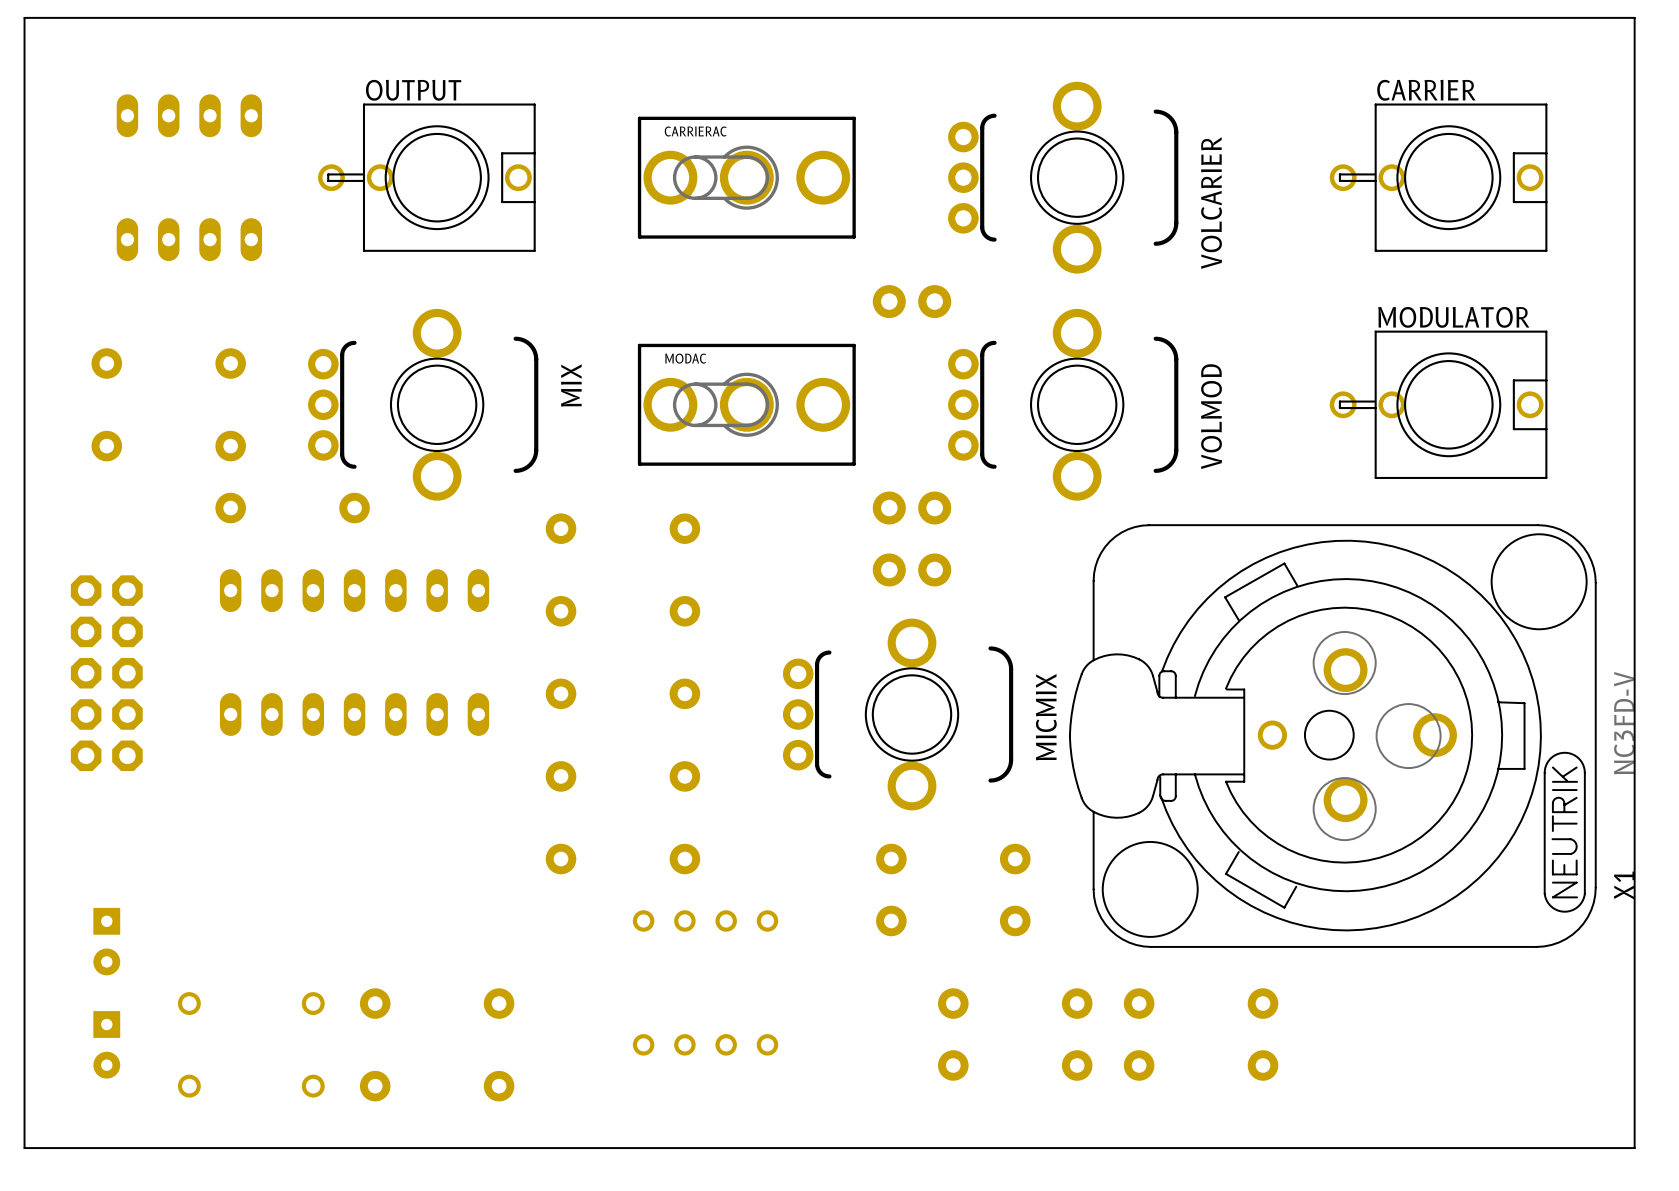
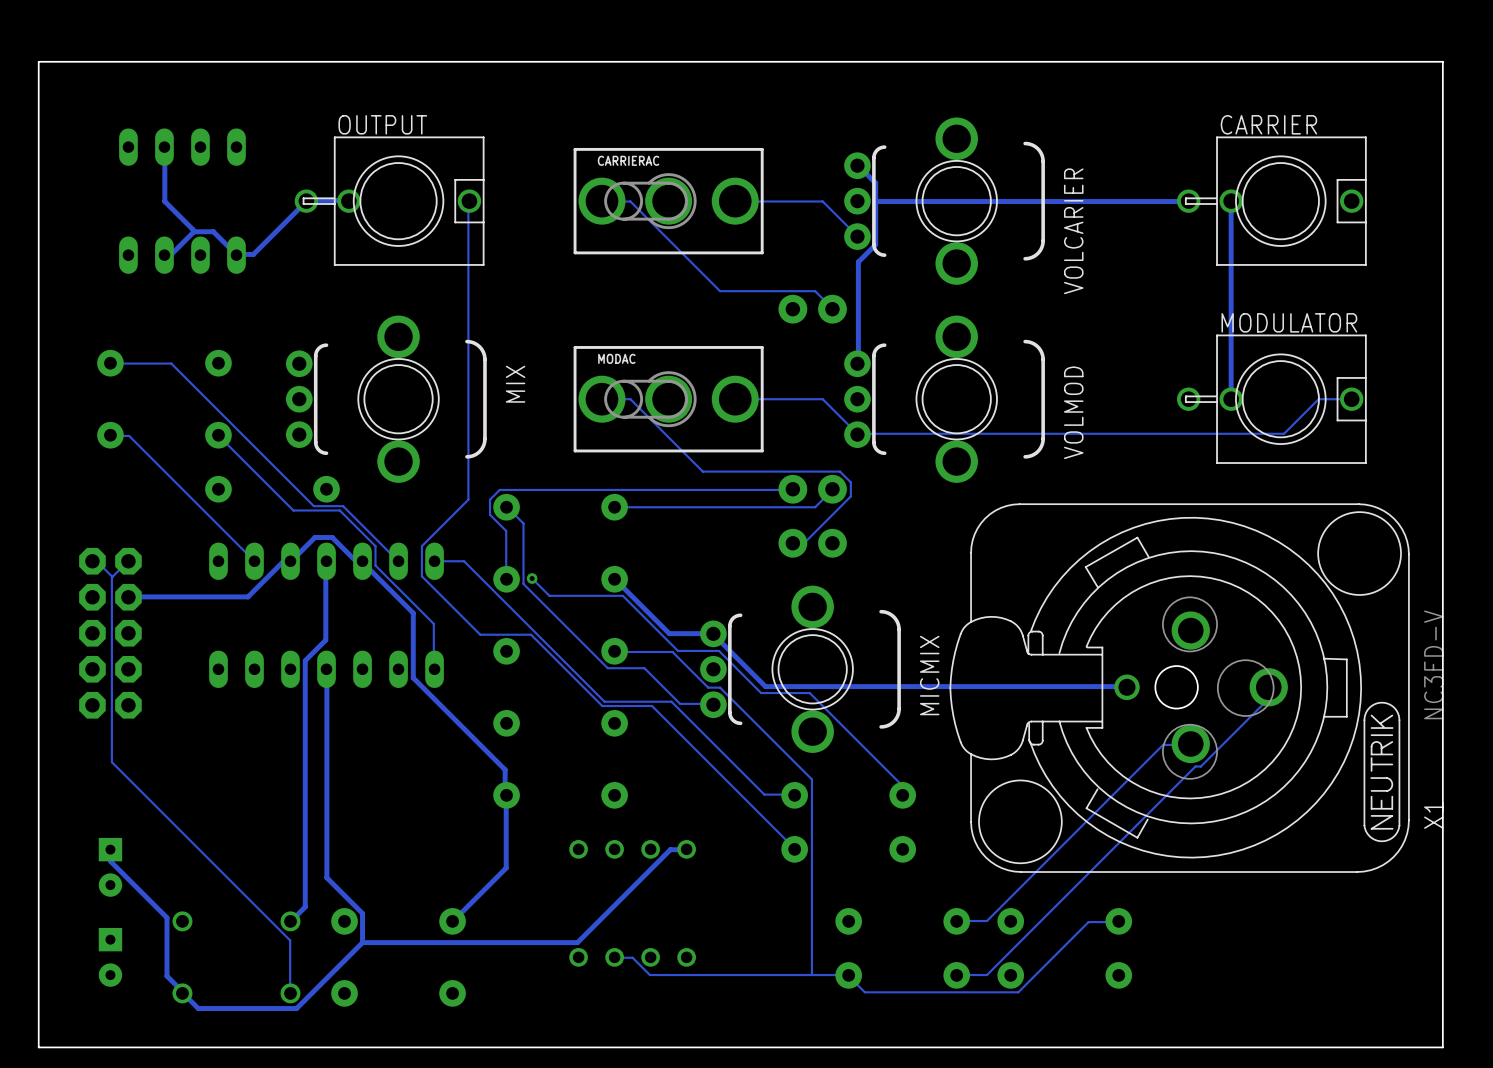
track: none -> (164, 147) (164, 201) (194, 231)
track: none -> (857, 165) (875, 183) (875, 244) (858, 262) (857, 363)
track: none -> (348, 201) (306, 201) (253, 254) (236, 255) (213, 231) (194, 231)
track: none -> (469, 201) (468, 499) (421, 546) (421, 576) (480, 634) (531, 634) (602, 706) (652, 706) (794, 849)
track: none -> (601, 201) (630, 201) (720, 291) (815, 291) (832, 309)
track: none -> (735, 201) (822, 201) (857, 236)
track: none -> (1188, 201) (875, 201)
track: none -> (1231, 201) (1231, 399)
track: none -> (194, 231) (171, 254) (164, 255)
track: none -> (110, 363) (171, 363) (313, 506) (343, 506) (398, 561)
track: none -> (601, 399) (630, 399) (702, 471) (840, 471) (850, 482) (850, 496) (804, 542) (792, 543)
track: none -> (1351, 399) (1318, 399) (1284, 433) (857, 434) (822, 399) (735, 399)
track: none -> (110, 435) (129, 435) (254, 561)
track: none -> (218, 435) (293, 510) (339, 510) (375, 546) (375, 565) (433, 623) (434, 669)
track: none -> (792, 489) (499, 489) (490, 499) (490, 514) (506, 531) (506, 579)
track: none -> (832, 489) (815, 507) (614, 507)
track: none -> (506, 507) (523, 523) (523, 583) (607, 668) (644, 668) (680, 703) (713, 704)
track: none -> (92, 561) (96, 561) (112, 576)
track: none -> (128, 561) (111, 577) (111, 762) (290, 940) (290, 993)
track: none -> (326, 561) (325, 640) (305, 660) (305, 906) (290, 921)
track: none -> (434, 561) (464, 561) (604, 701) (671, 701) (764, 794) (794, 795)
track: none -> (532, 578) (549, 595) (622, 595) (677, 650) (719, 650) (761, 693) (809, 693) (902, 785) (902, 795)
via: none -> (532, 578)
track: none -> (614, 579) (669, 633) (713, 633) (765, 686) (1126, 687)
track: none -> (128, 597) (248, 596) (282, 562) (291, 561) (314, 537) (332, 537) (356, 561) (362, 561) (413, 613) (413, 677) (505, 769) (506, 868) (452, 921)
track: none -> (614, 651) (672, 652) (708, 687) (720, 687) (811, 779) (811, 975)
track: none -> (326, 669) (326, 877) (362, 913) (362, 942)
track: none -> (1268, 687) (1267, 699) (1200, 766) (1195, 766) (986, 975) (956, 975)
track: none -> (1190, 744) (1163, 744) (986, 921) (956, 921)
track: none -> (686, 849) (670, 849) (577, 942) (362, 942)
track: none -> (110, 849) (110, 861) (166, 917) (166, 976) (198, 1008) (296, 1008) (362, 942)
track: none -> (1118, 921) (1088, 922) (1018, 992) (864, 992) (848, 975) (649, 975) (632, 957) (614, 957)

